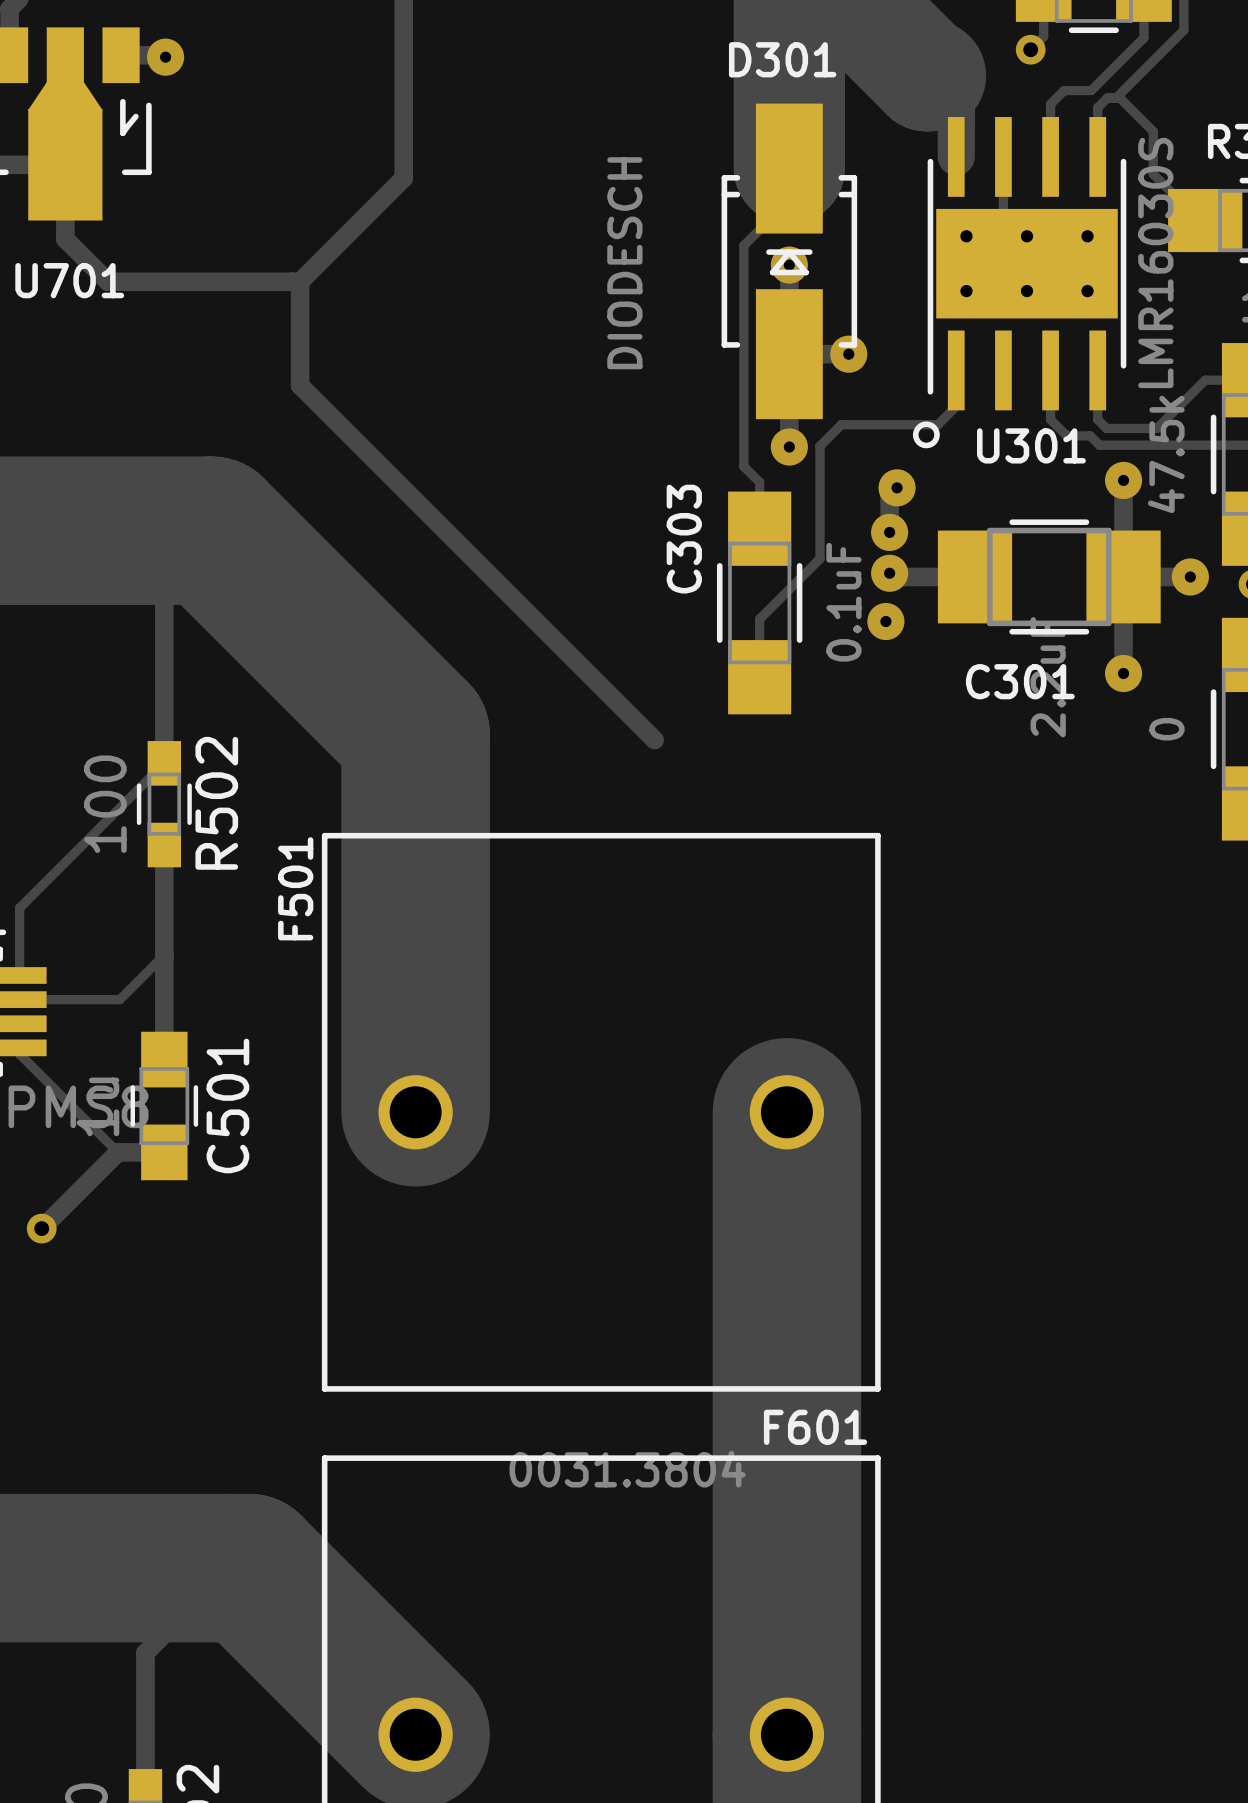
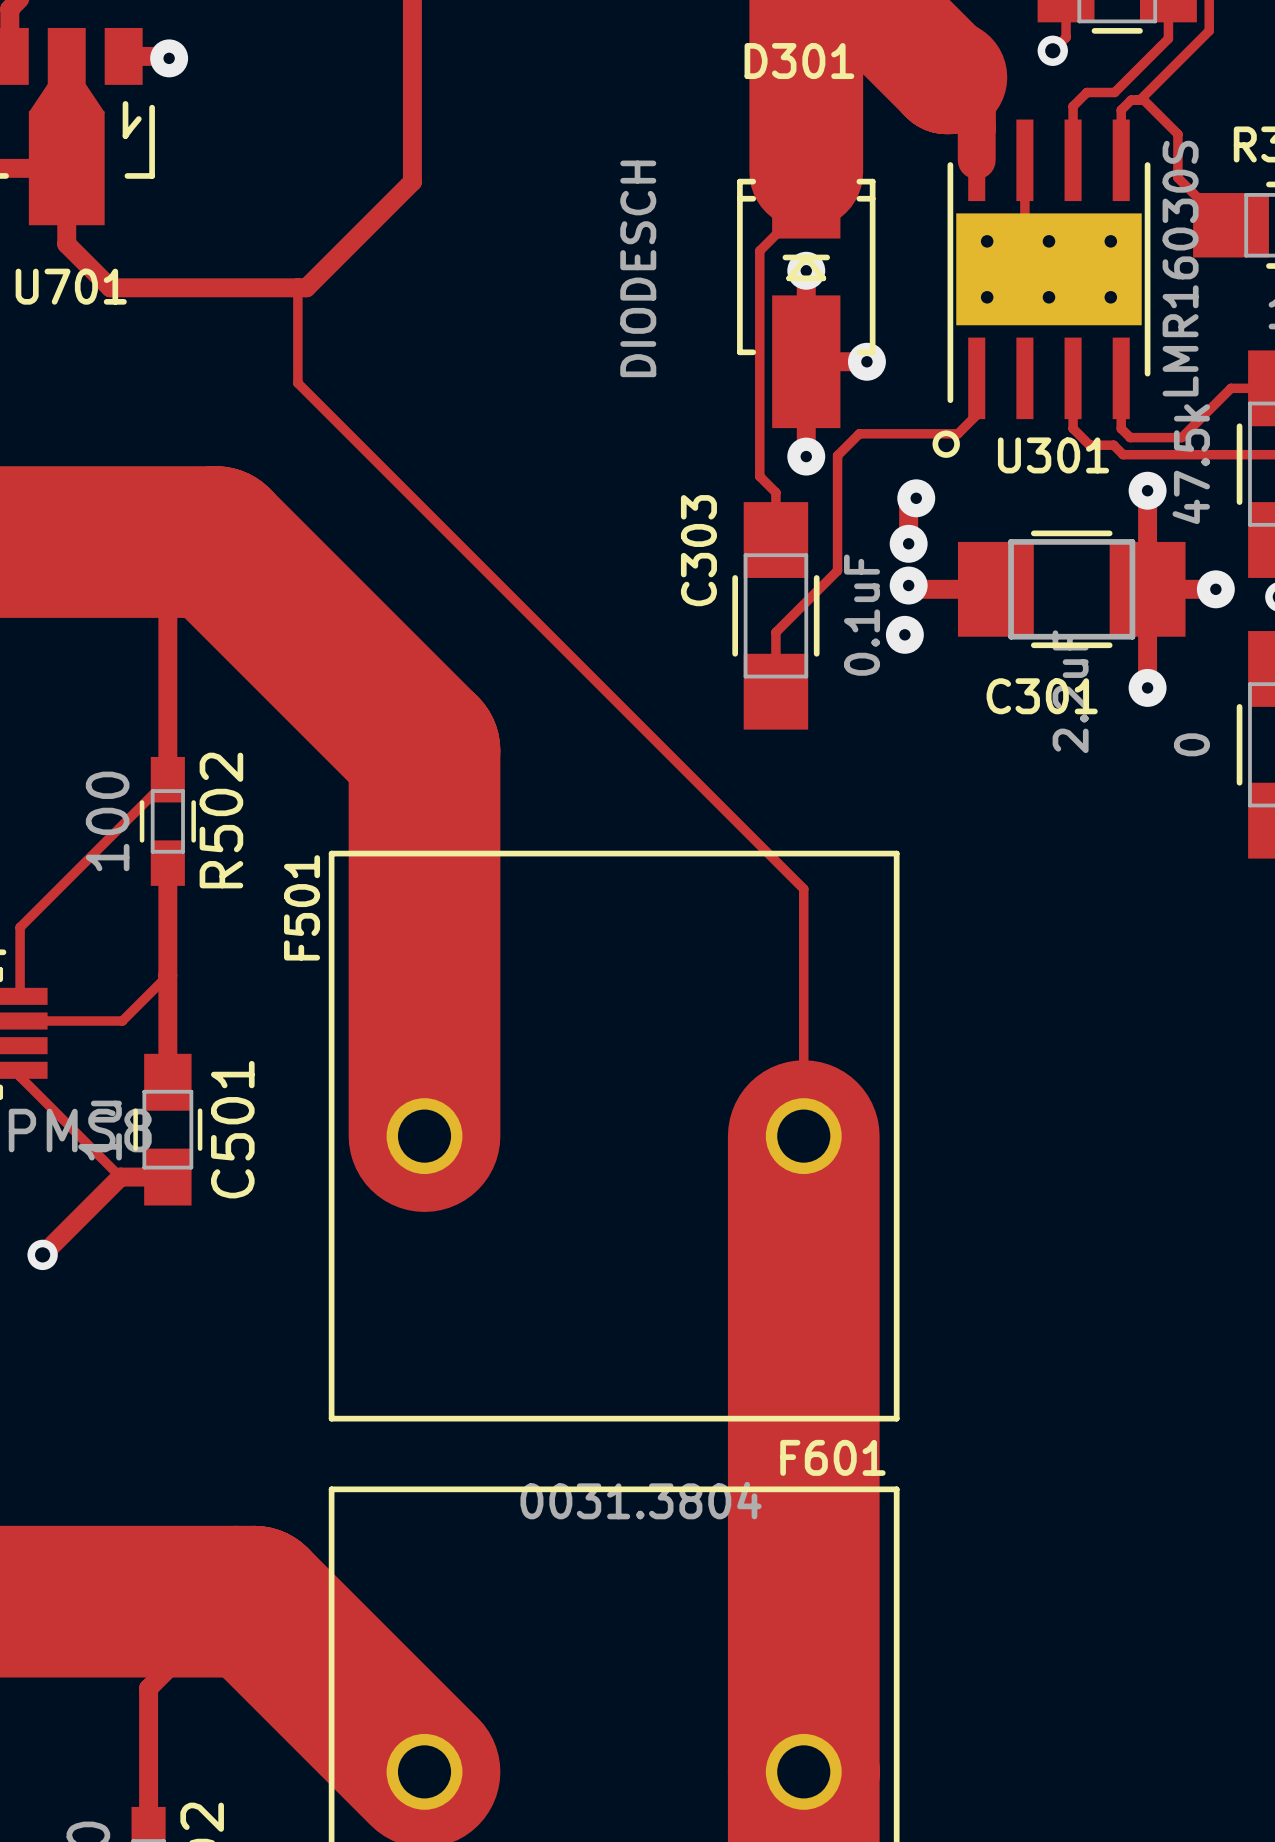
track: none -> (297, 287) (297, 383) (803, 889) (803, 1136)
track: (300, 281) (300, 385) (654, 740) -> none

